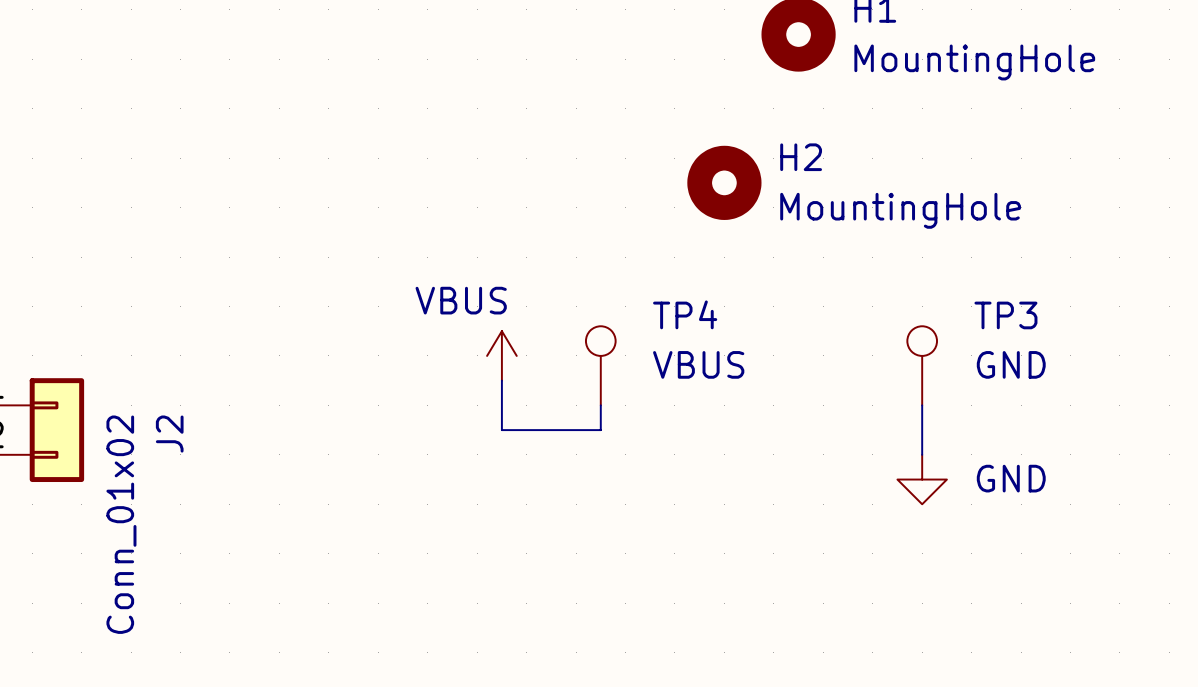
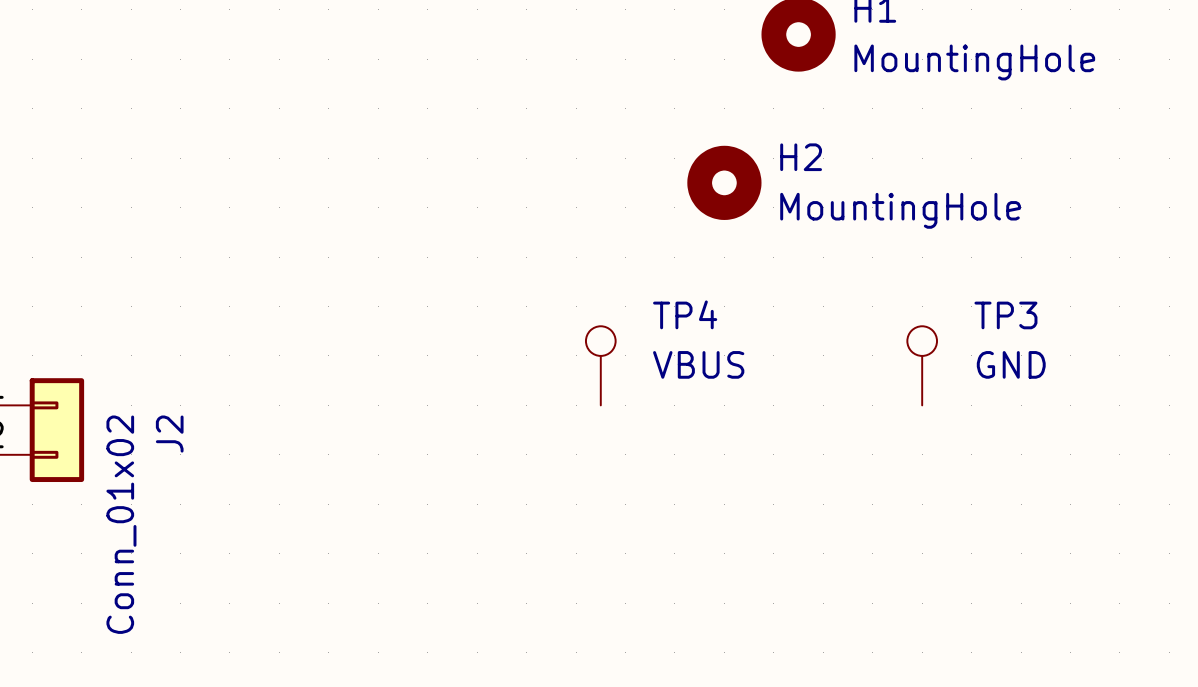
power symbol: VBUS (501, 355) -> none
wire: (501, 380) (501, 430) (600, 430) (600, 405) -> none
wire: (922, 405) (922, 454) -> none
power symbol: GND (922, 479) -> none

